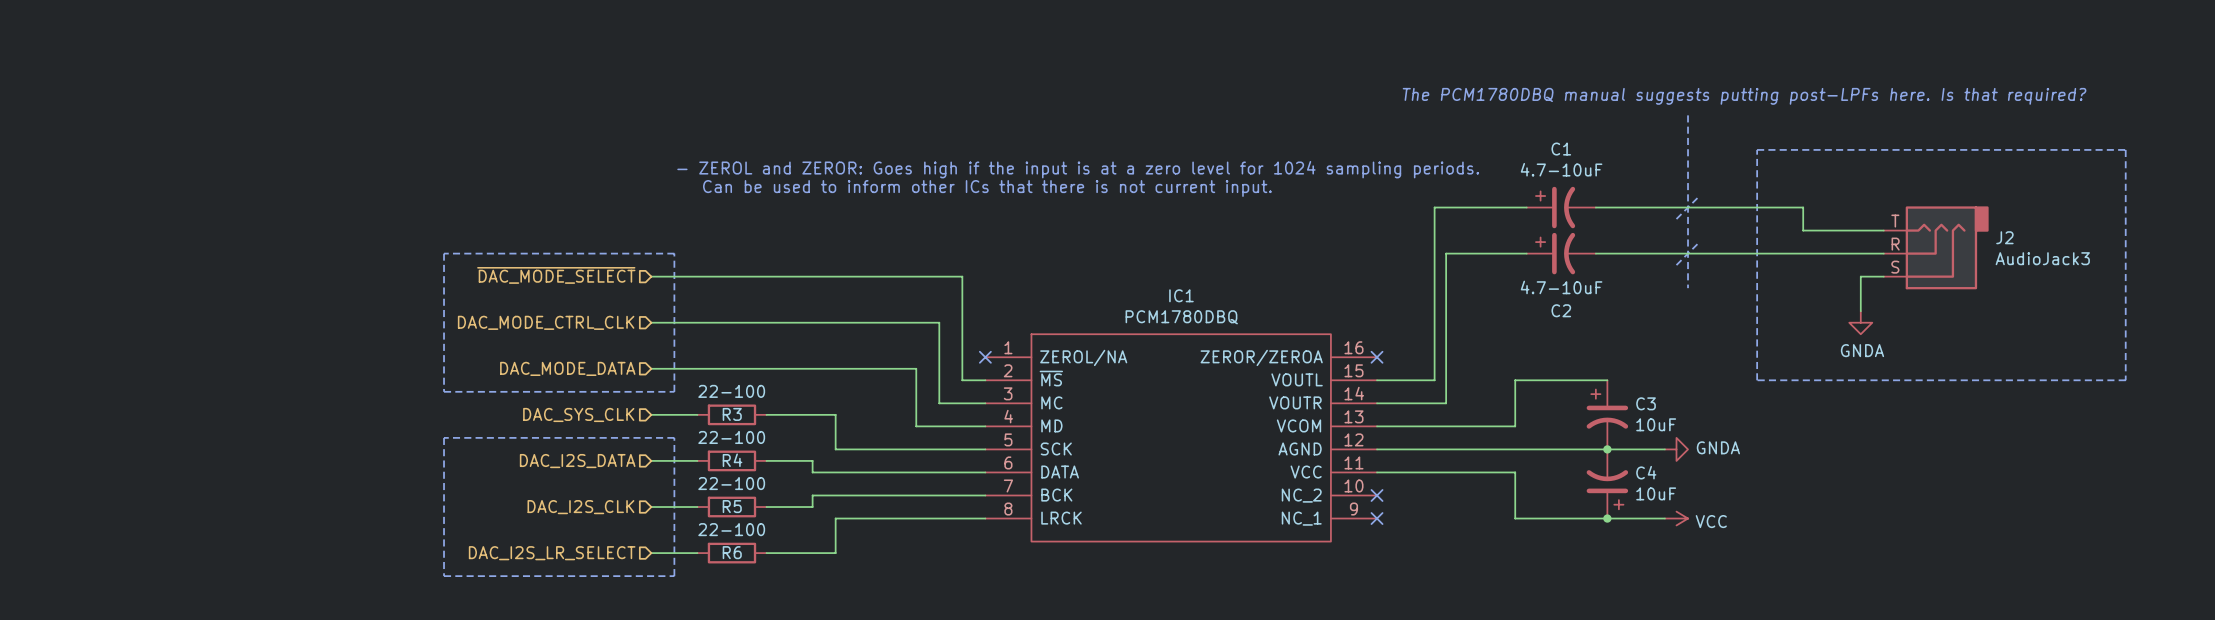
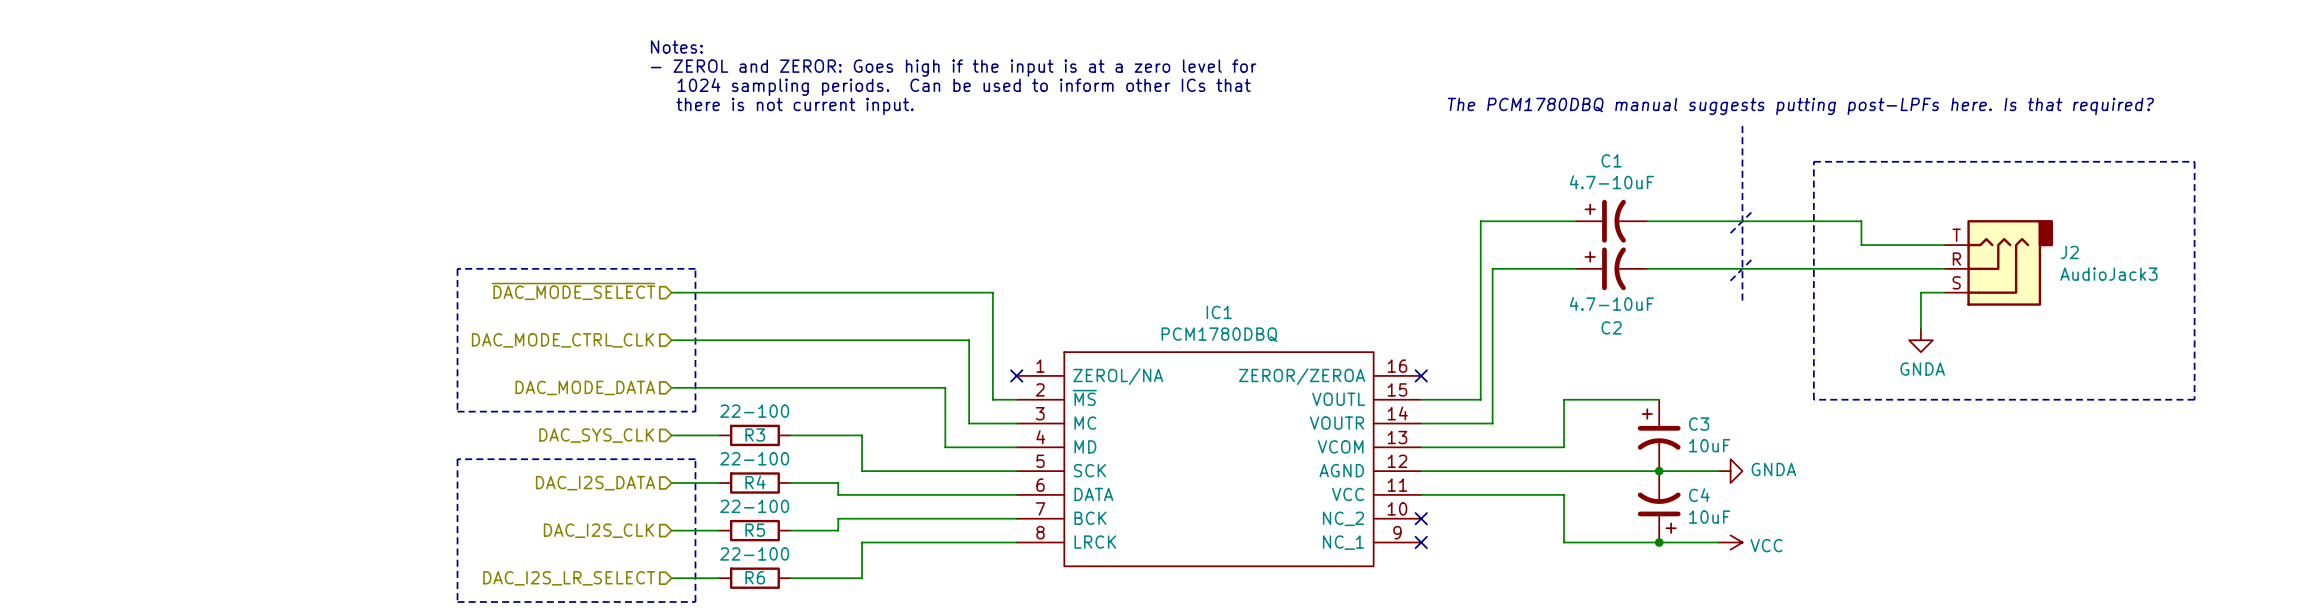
text: none -> Notes: (676, 46)
text: none -> - ZEROL and ZEROR: Goes high if the input is at a zero level for (953, 68)
text: none -> 1024 sampling periods. Can be used to inform other ICs that (964, 86)
text: none -> there is not current input. (794, 106)
text: - ZEROL and ZEROR: Goes high if the input is at a zero level for 1024 sampling periods. (1078, 169) -> none
text: Can be used to inform other ICs that there is not current input. (987, 188) -> none

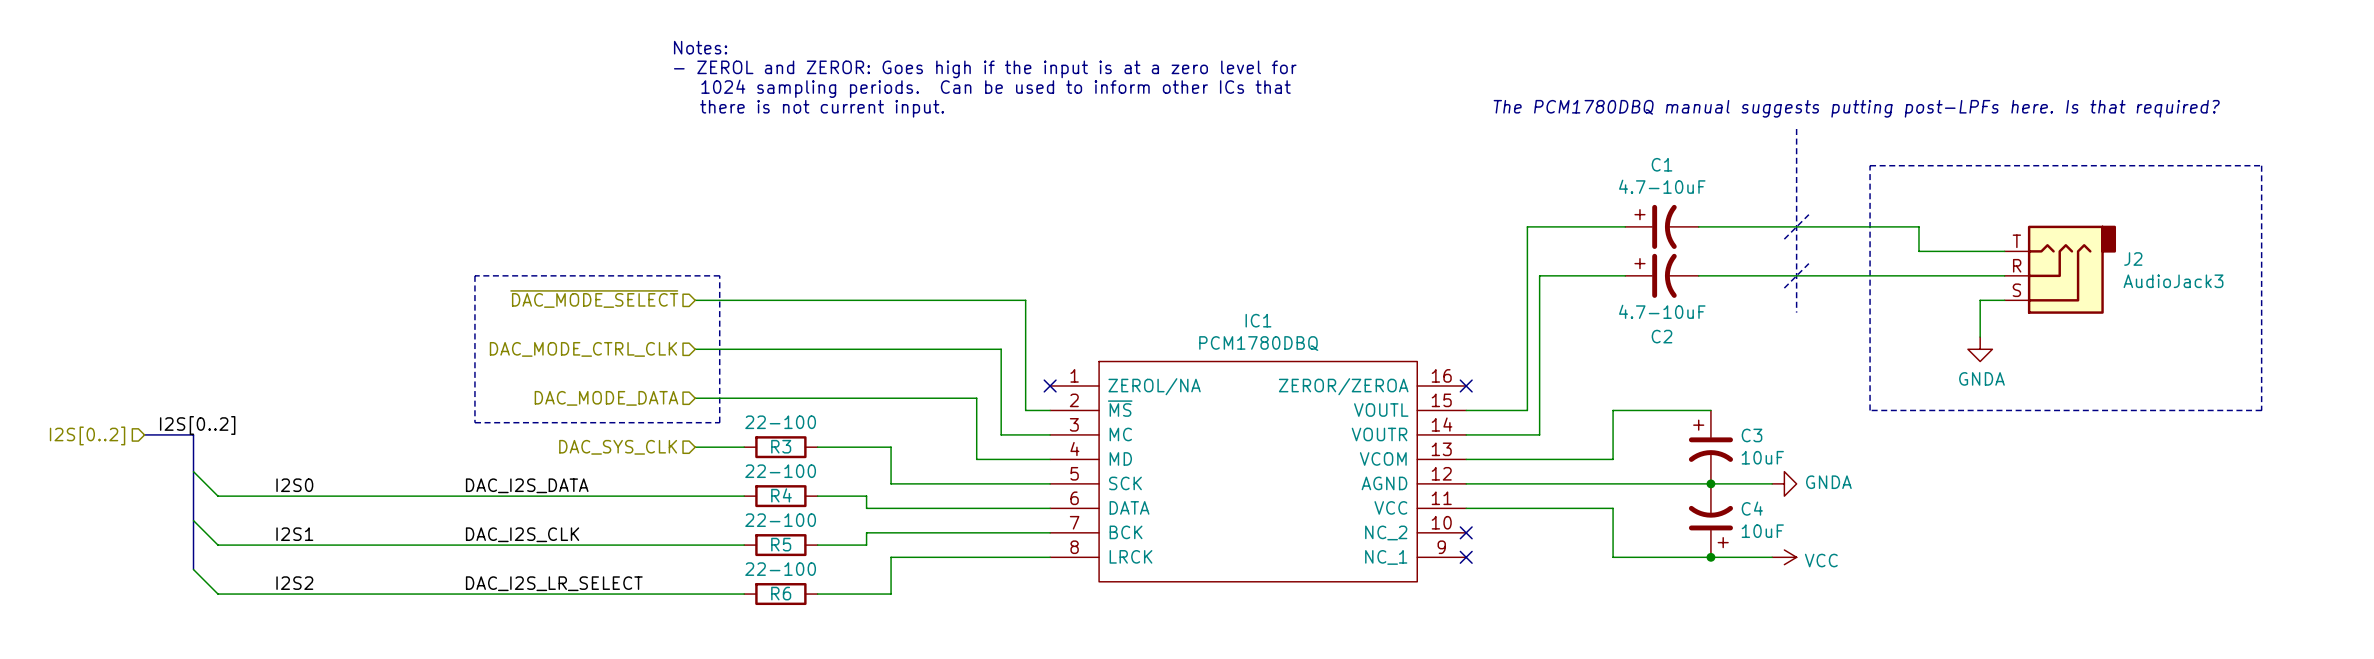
label: none -> I2S[0..2] (197, 425)
bus: none -> (144, 434) (193, 434) (193, 569)
hierarchical label: none -> I2S[0..2] (87, 435)
wire: none -> (193, 471) (217, 496) (695, 496)
line: (457, 459) (457, 601) (695, 601) (695, 459) (457, 459) -> none
label: none -> I2S0 (294, 485)
label: none -> DAC_I2S_DATA (527, 485)
hierarchical label: DAC_I2S_DATA (595, 483) -> none
wire: none -> (193, 520) (217, 545) (695, 545)
label: none -> I2S1 (294, 534)
label: none -> DAC_I2S_CLK (522, 534)
hierarchical label: DAC_I2S_CLK (598, 530) -> none
wire: none -> (193, 569) (217, 594) (695, 594)
label: none -> I2S2 (294, 583)
label: none -> DAC_I2S_LR_SELECT (554, 583)
hierarchical label: DAC_I2S_LR_SELECT (569, 578) -> none

